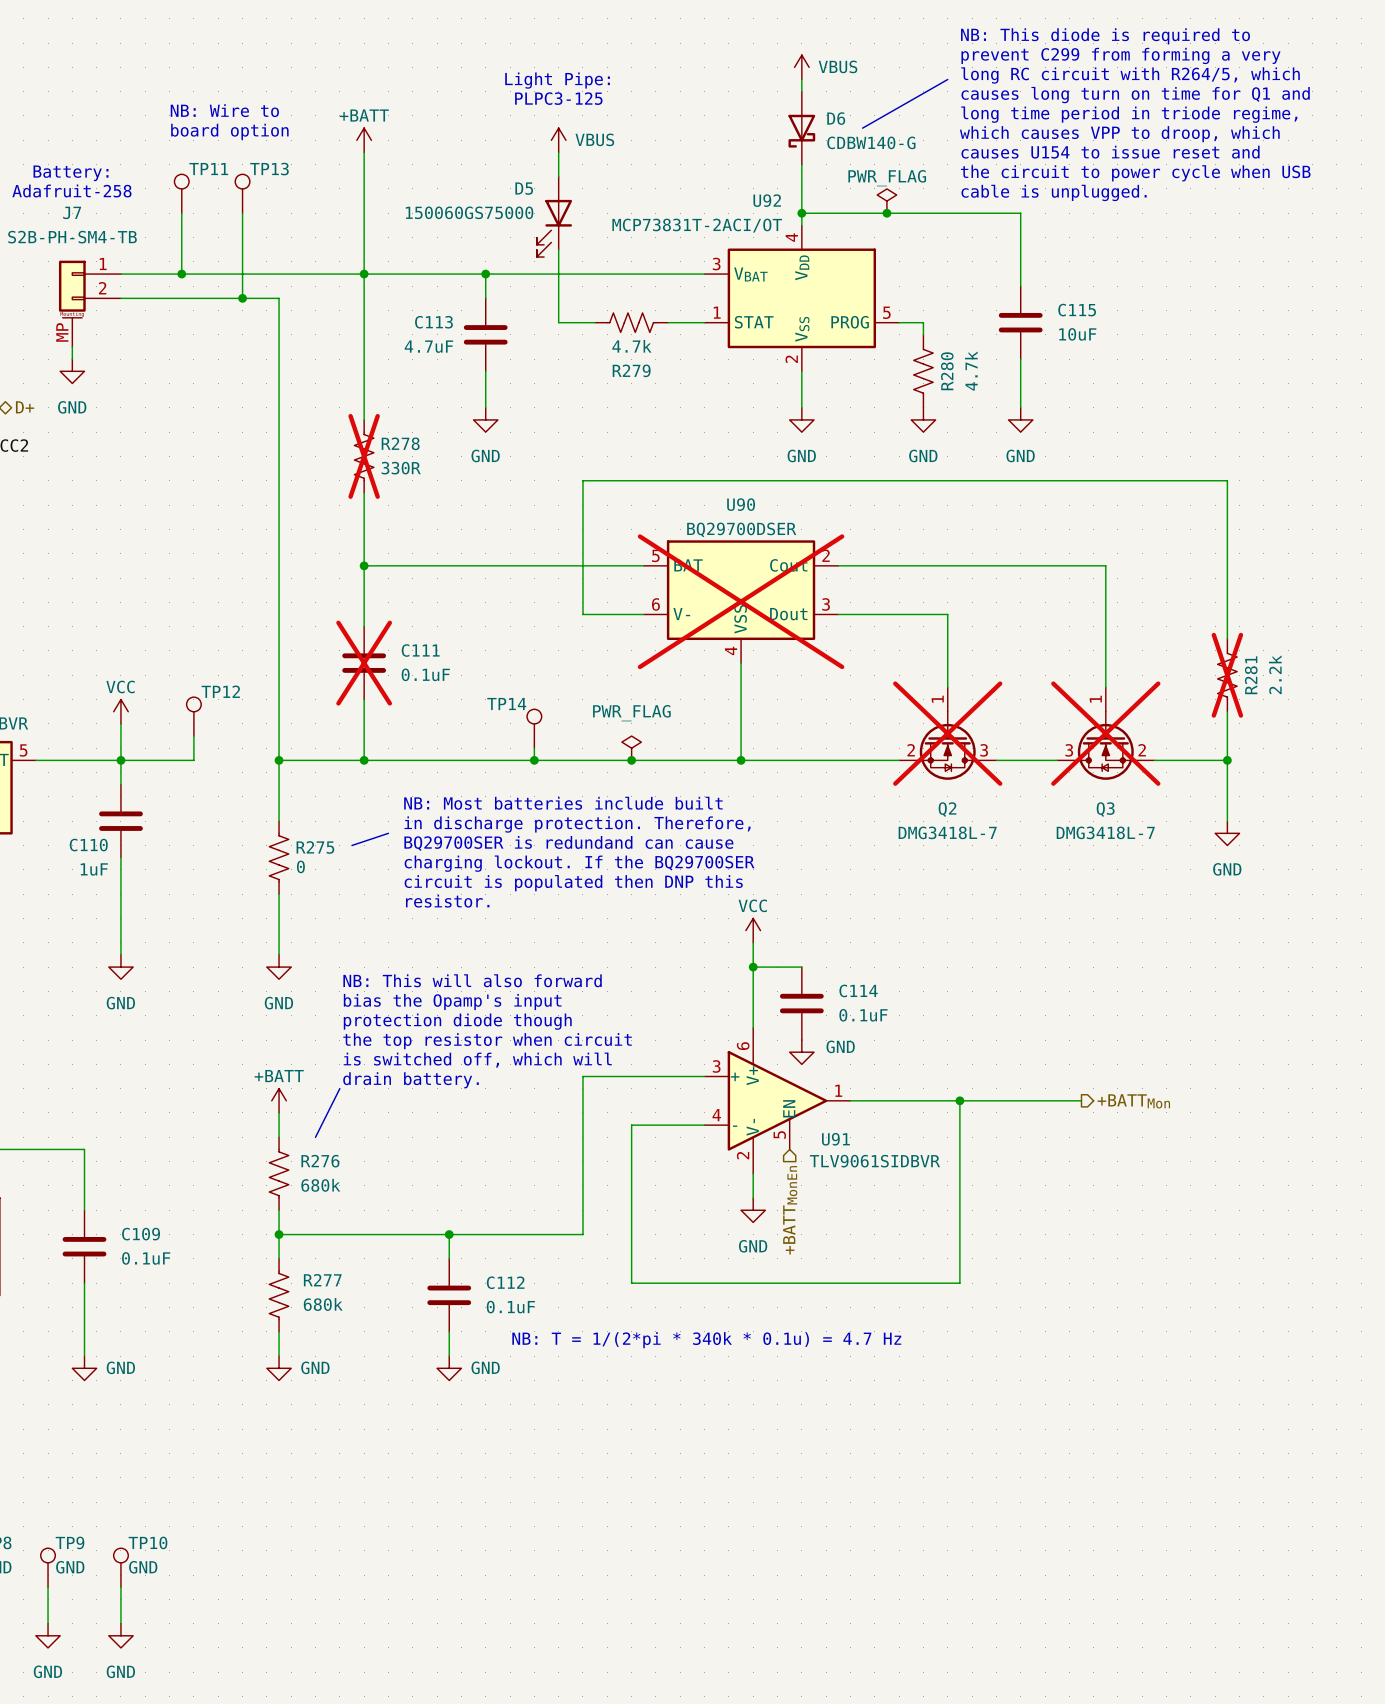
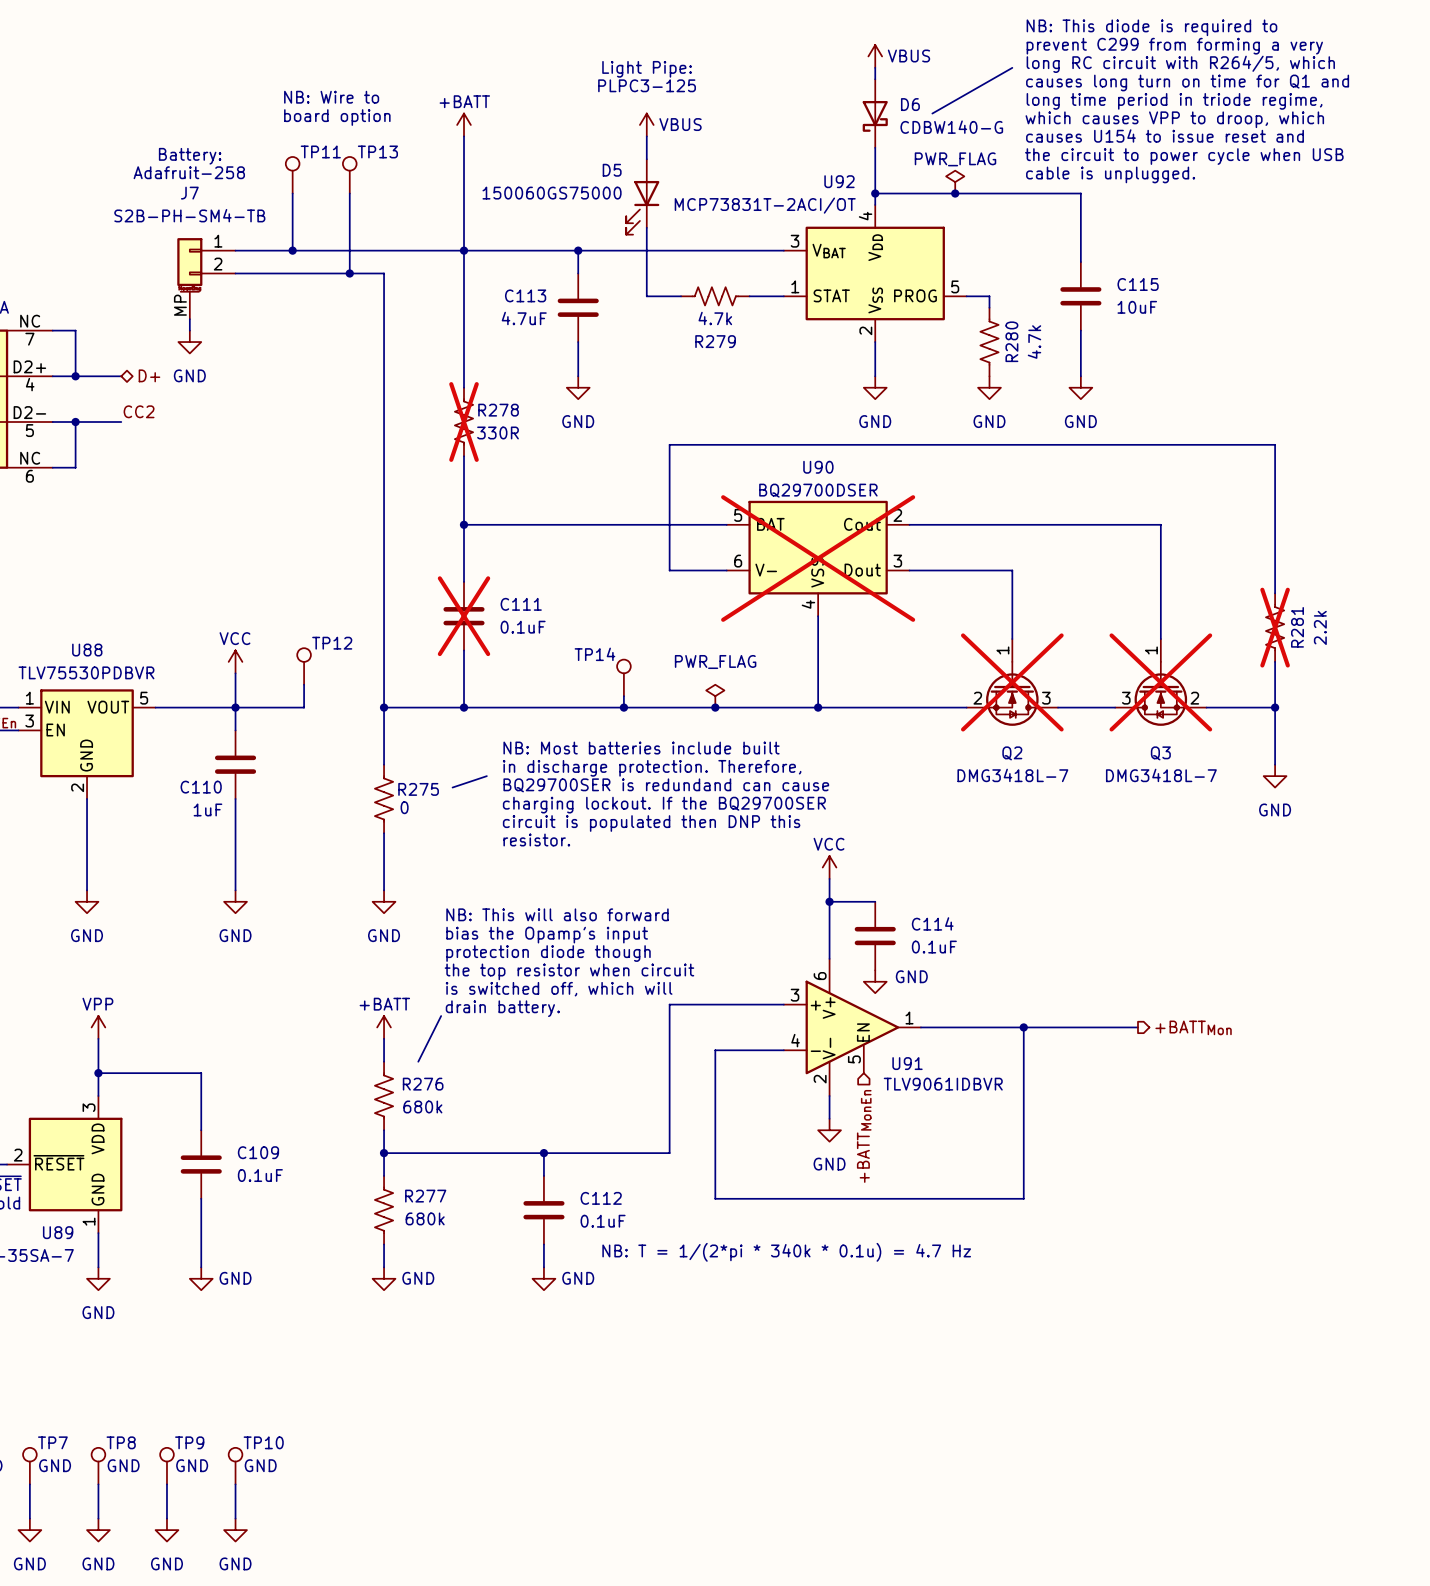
U91 value: TLV9061SIDBVR (874, 1161) -> TLV9061IDBVR (943, 1084)

